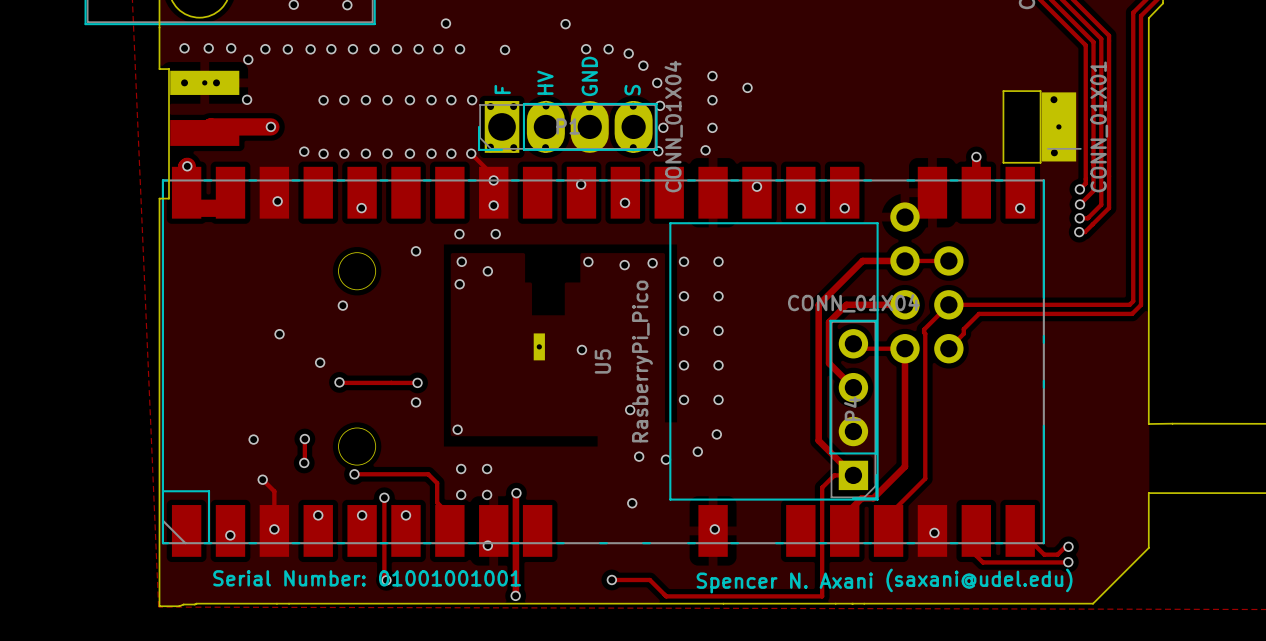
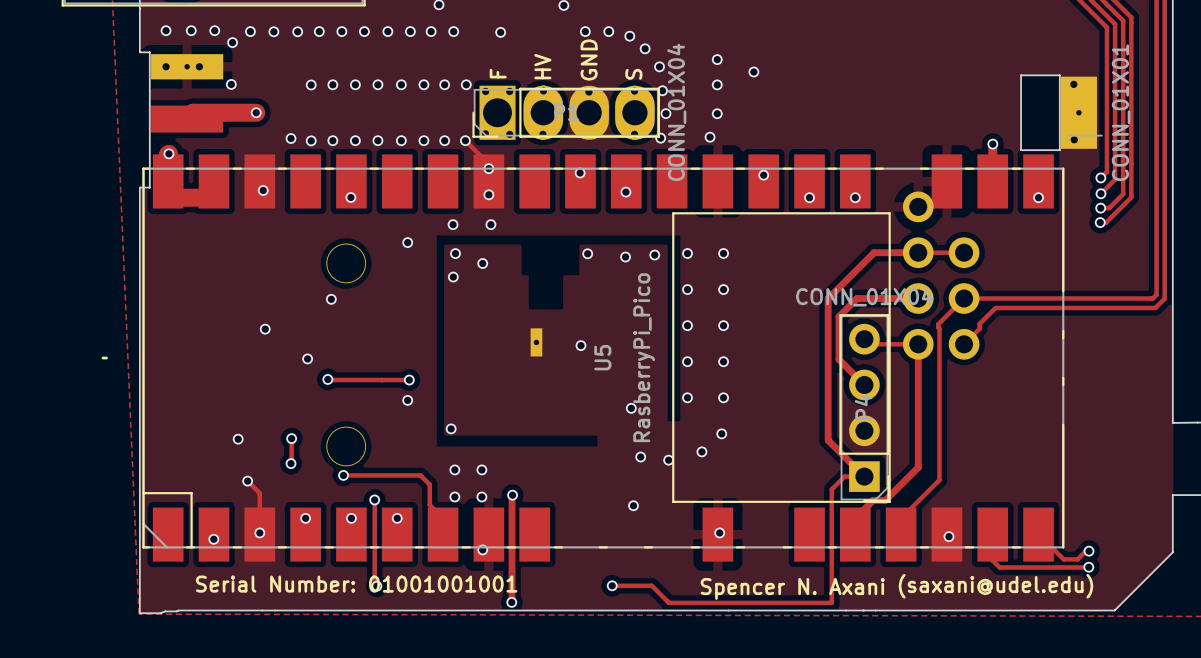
line: none -> (102, 358) (106, 358)

